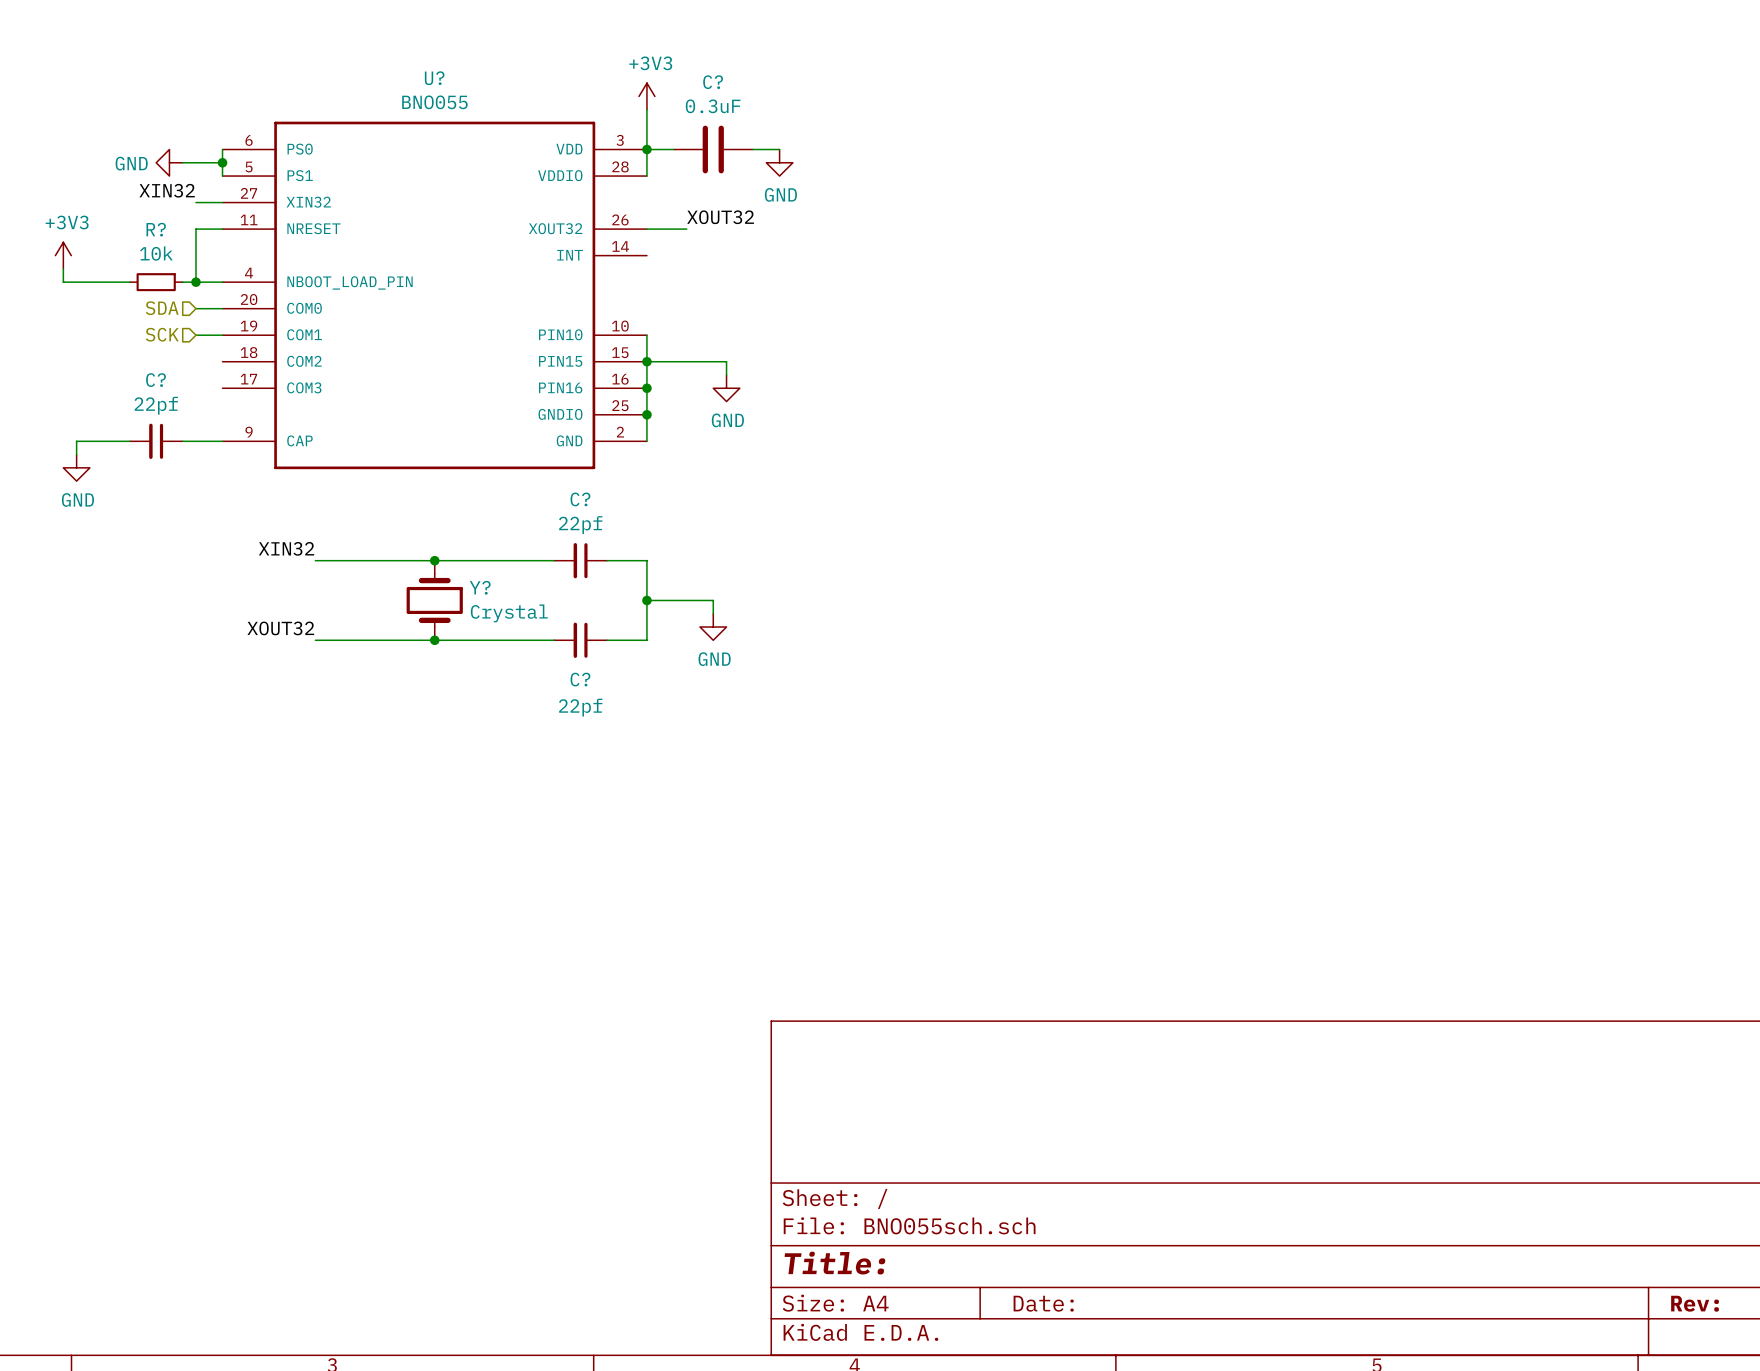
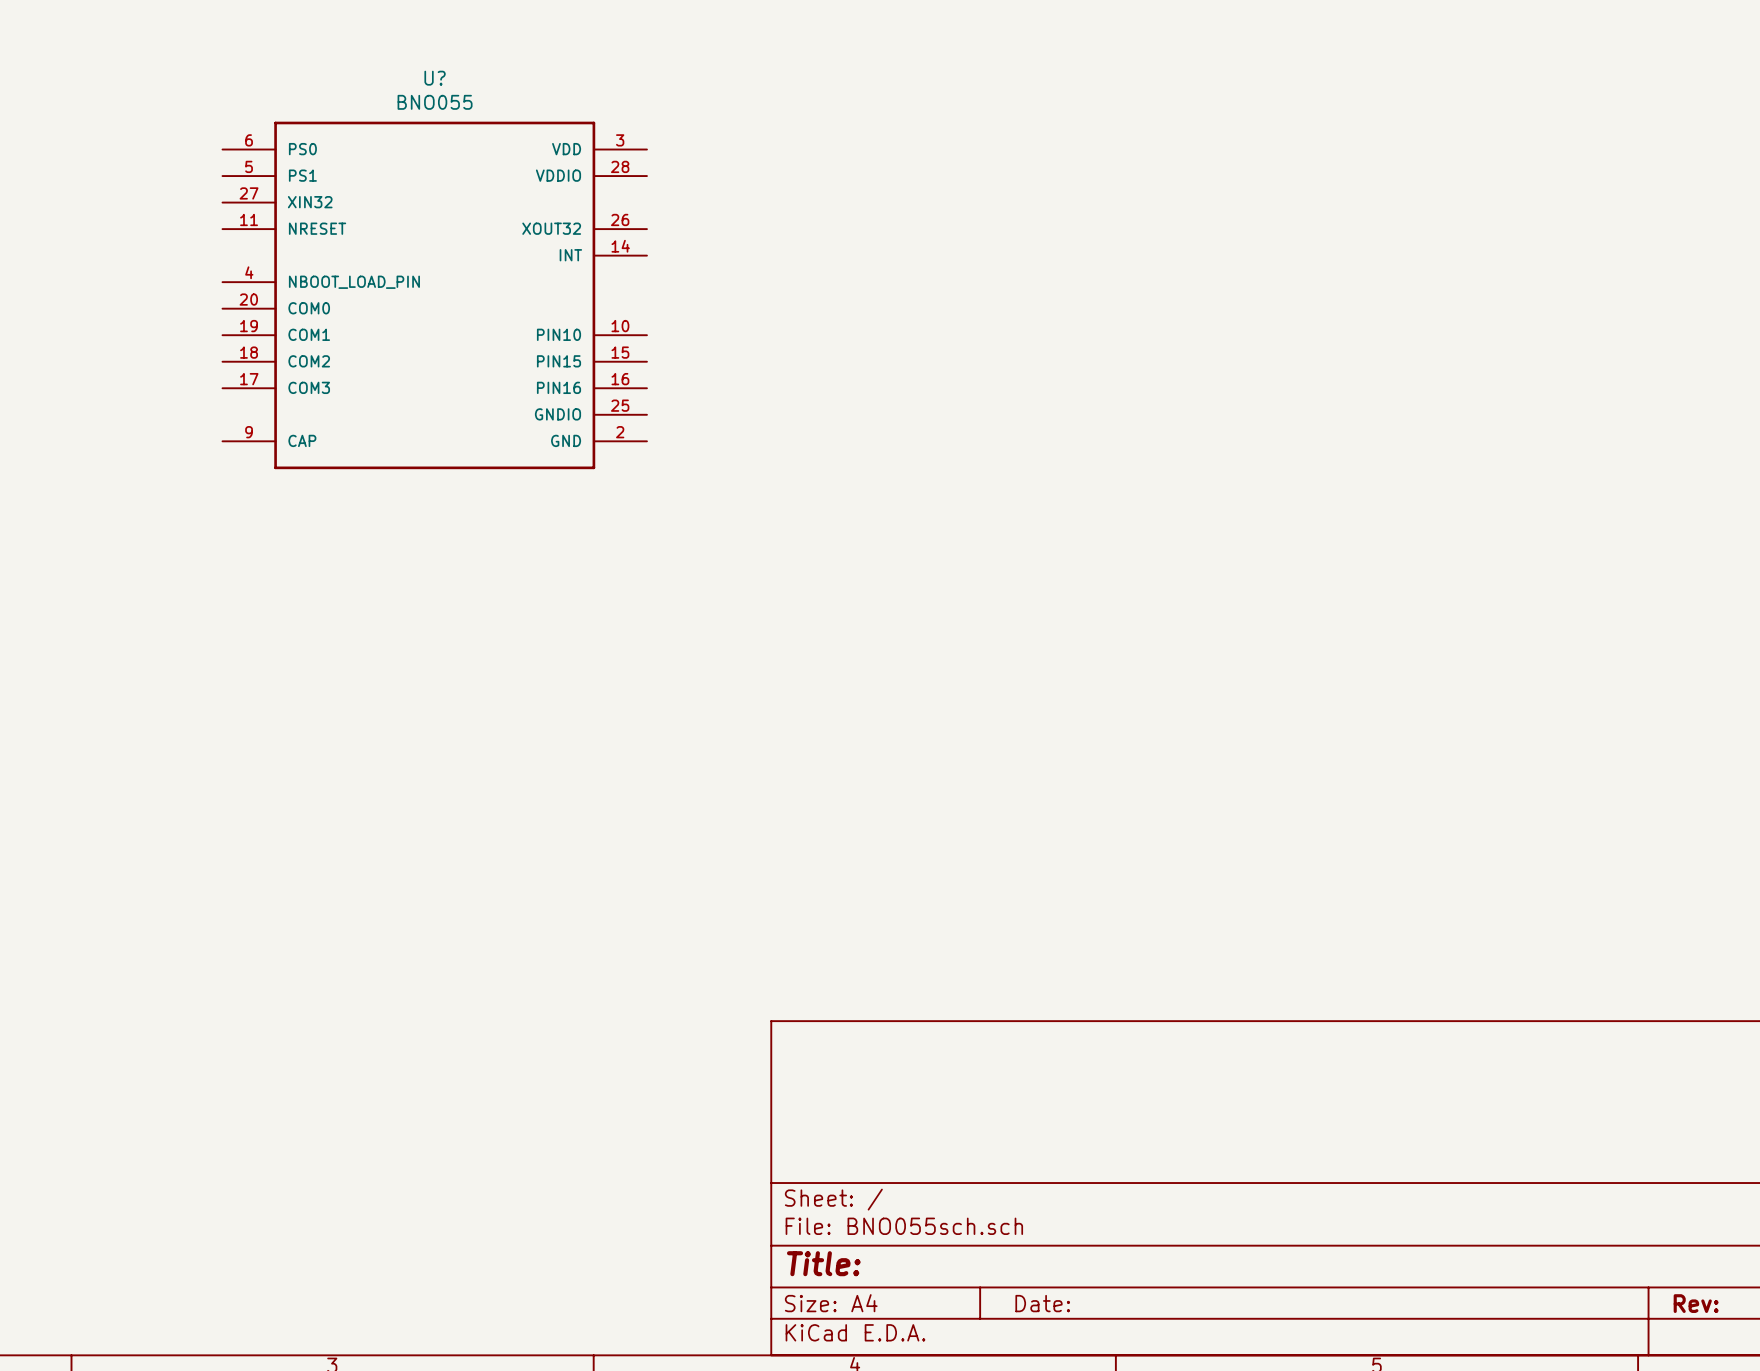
power symbol: +3V3 (646, 96) -> none
wire: (646, 109) (646, 176) -> none
wire: (222, 149) (222, 176) -> none
wire: (646, 149) (673, 149) -> none
junction: (646, 149) -> none
C?: 0.3uF (713, 149) -> none
wire: (753, 149) (779, 149) -> none
power symbol: GND (169, 162) -> none
wire: (182, 162) (222, 162) -> none
junction: (222, 162) -> none
power symbol: GND (779, 162) -> none
label: XIN32 (167, 190) -> none
wire: (195, 202) (222, 202) -> none
label: XOUT32 (720, 217) -> none
wire: (222, 229) (195, 229) (195, 282) -> none
wire: (646, 229) (686, 229) -> none
power symbol: +3V3 (63, 255) -> none
wire: (63, 268) (63, 282) (129, 282) -> none
R?: 10k (156, 282) -> none
wire: (182, 282) (222, 282) -> none
junction: (195, 282) -> none
hierarchical label: SDA (162, 308) -> none
wire: (195, 308) (222, 308) -> none
hierarchical label: SCK (162, 334) -> none
wire: (195, 335) (222, 335) -> none
wire: (646, 335) (646, 441) -> none
wire: (646, 361) (726, 361) (726, 374) -> none
junction: (646, 361) -> none
junction: (646, 388) -> none
power symbol: GND (726, 388) -> none
junction: (646, 414) -> none
wire: (129, 441) (76, 441) (76, 454) -> none
C?: 22pf (156, 441) -> none
wire: (182, 441) (222, 441) -> none
power symbol: GND (76, 467) -> none
label: XIN32 (286, 548) -> none
wire: (315, 560) (554, 560) -> none
junction: (434, 560) -> none
C?: 22pf (580, 560) -> none
wire: (607, 560) (646, 560) (646, 640) (607, 640) -> none
Y?: Crystal (434, 600) -> none
wire: (646, 600) (713, 600) (713, 613) -> none
junction: (646, 600) -> none
power symbol: GND (713, 627) -> none
label: XOUT32 (280, 628) -> none
wire: (315, 640) (554, 640) -> none
junction: (434, 640) -> none
C?: 22pf (580, 640) -> none

